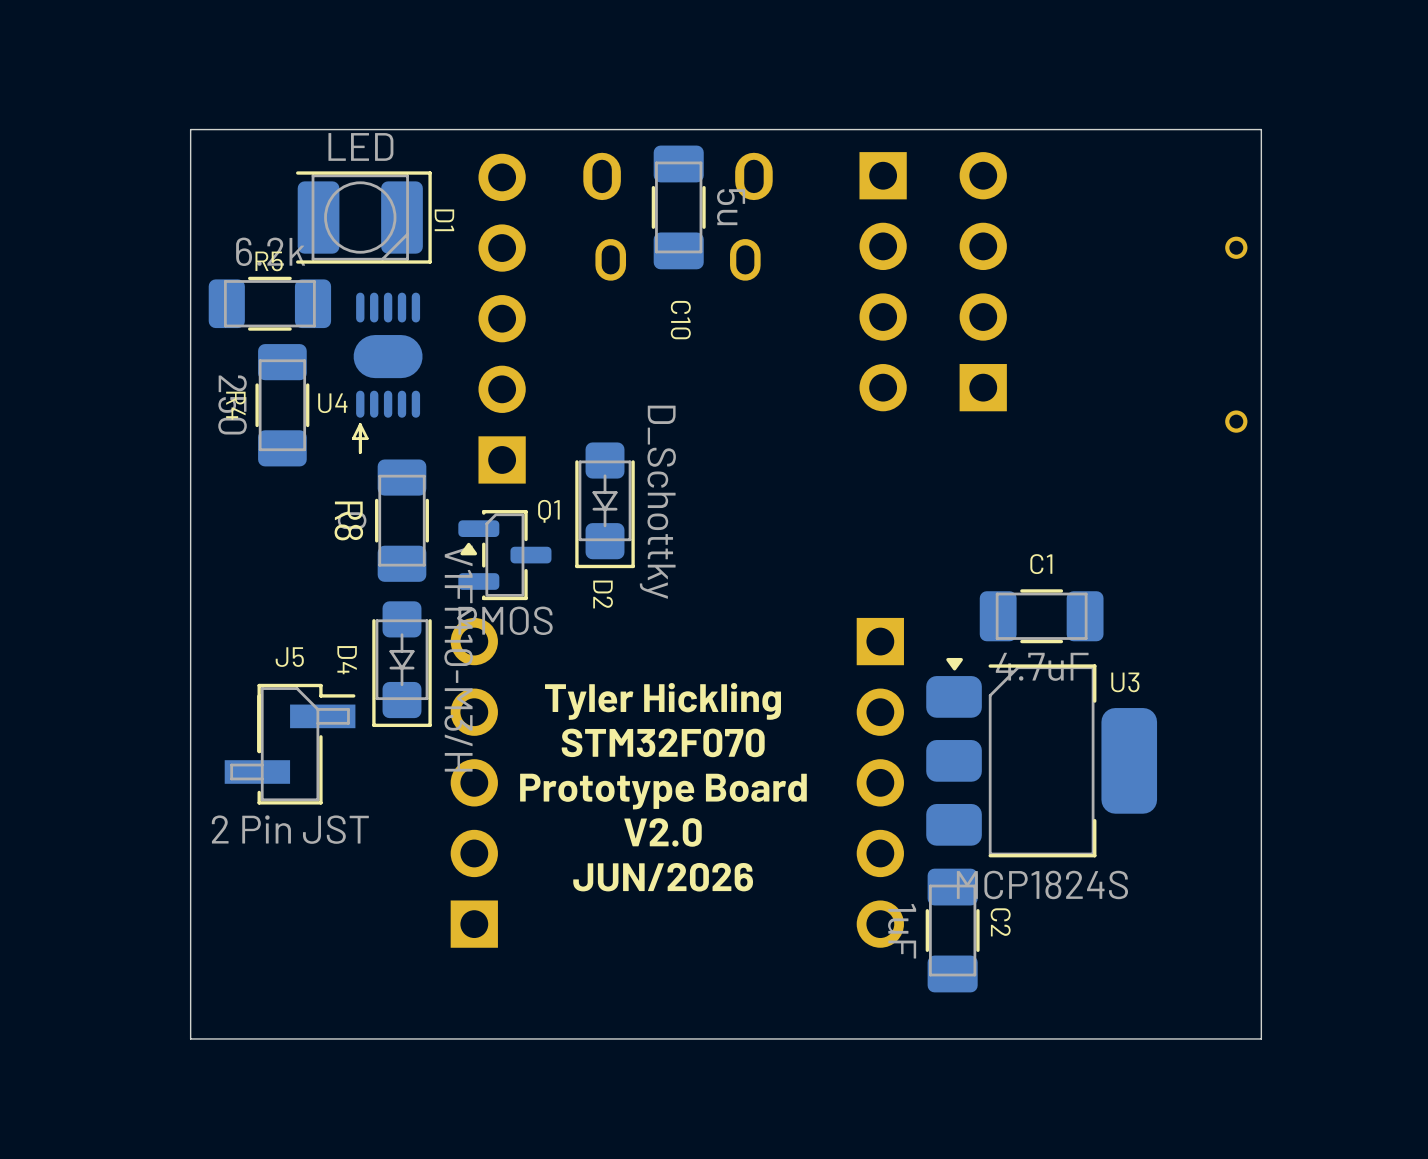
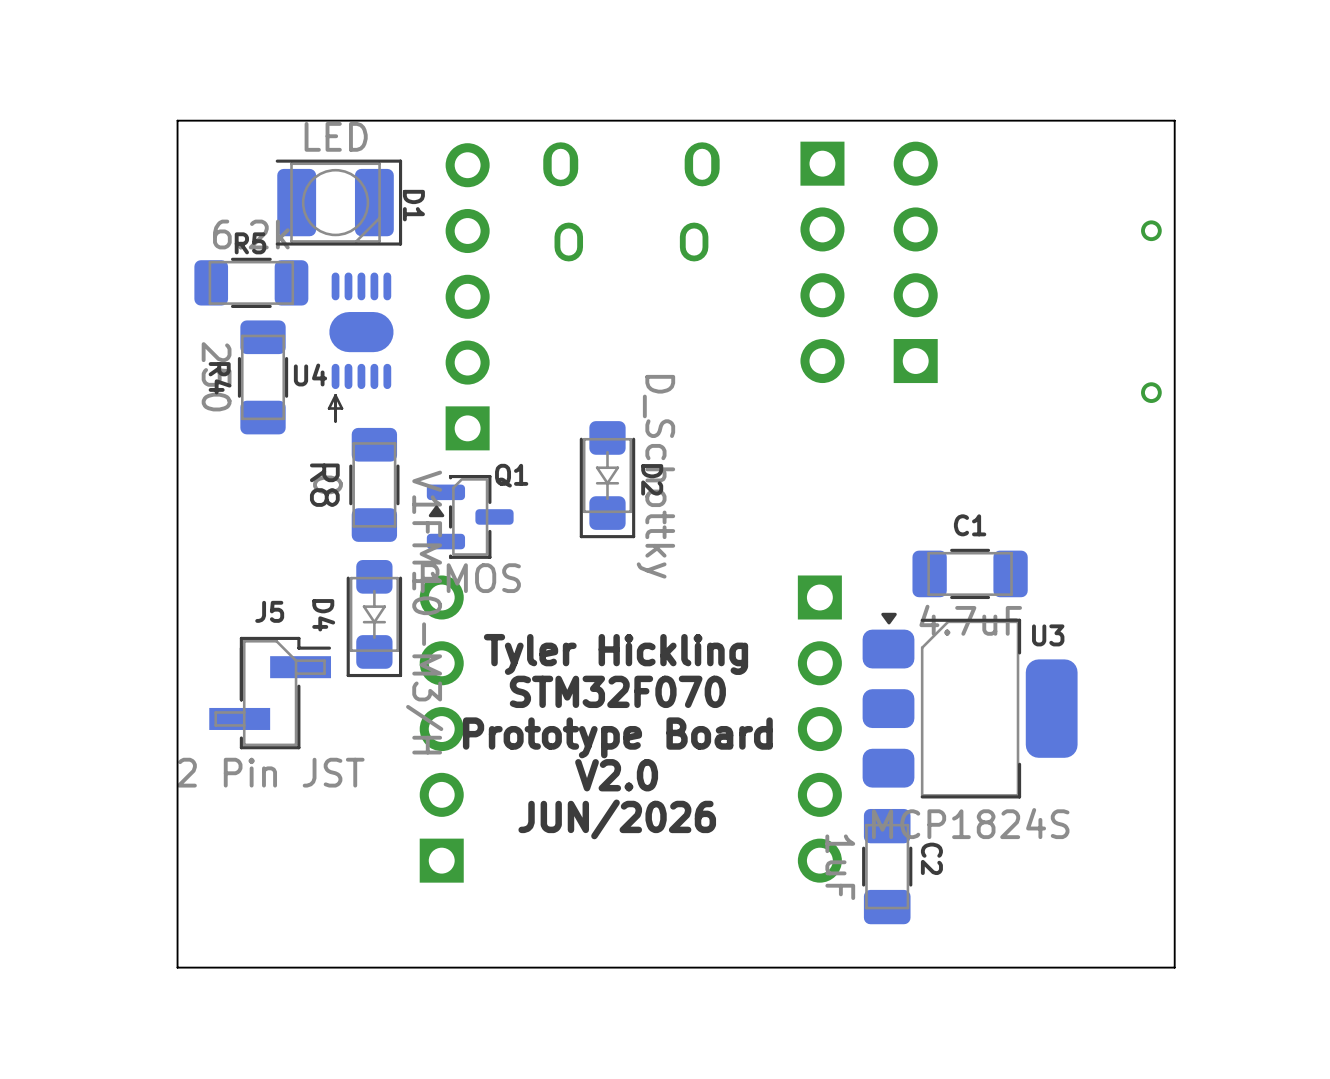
C10: 5u (678, 207) -> none
D2 position: (605, 505) -> (607, 479)
D2 name position: D2 (603, 594) -> D2 (652, 479)

